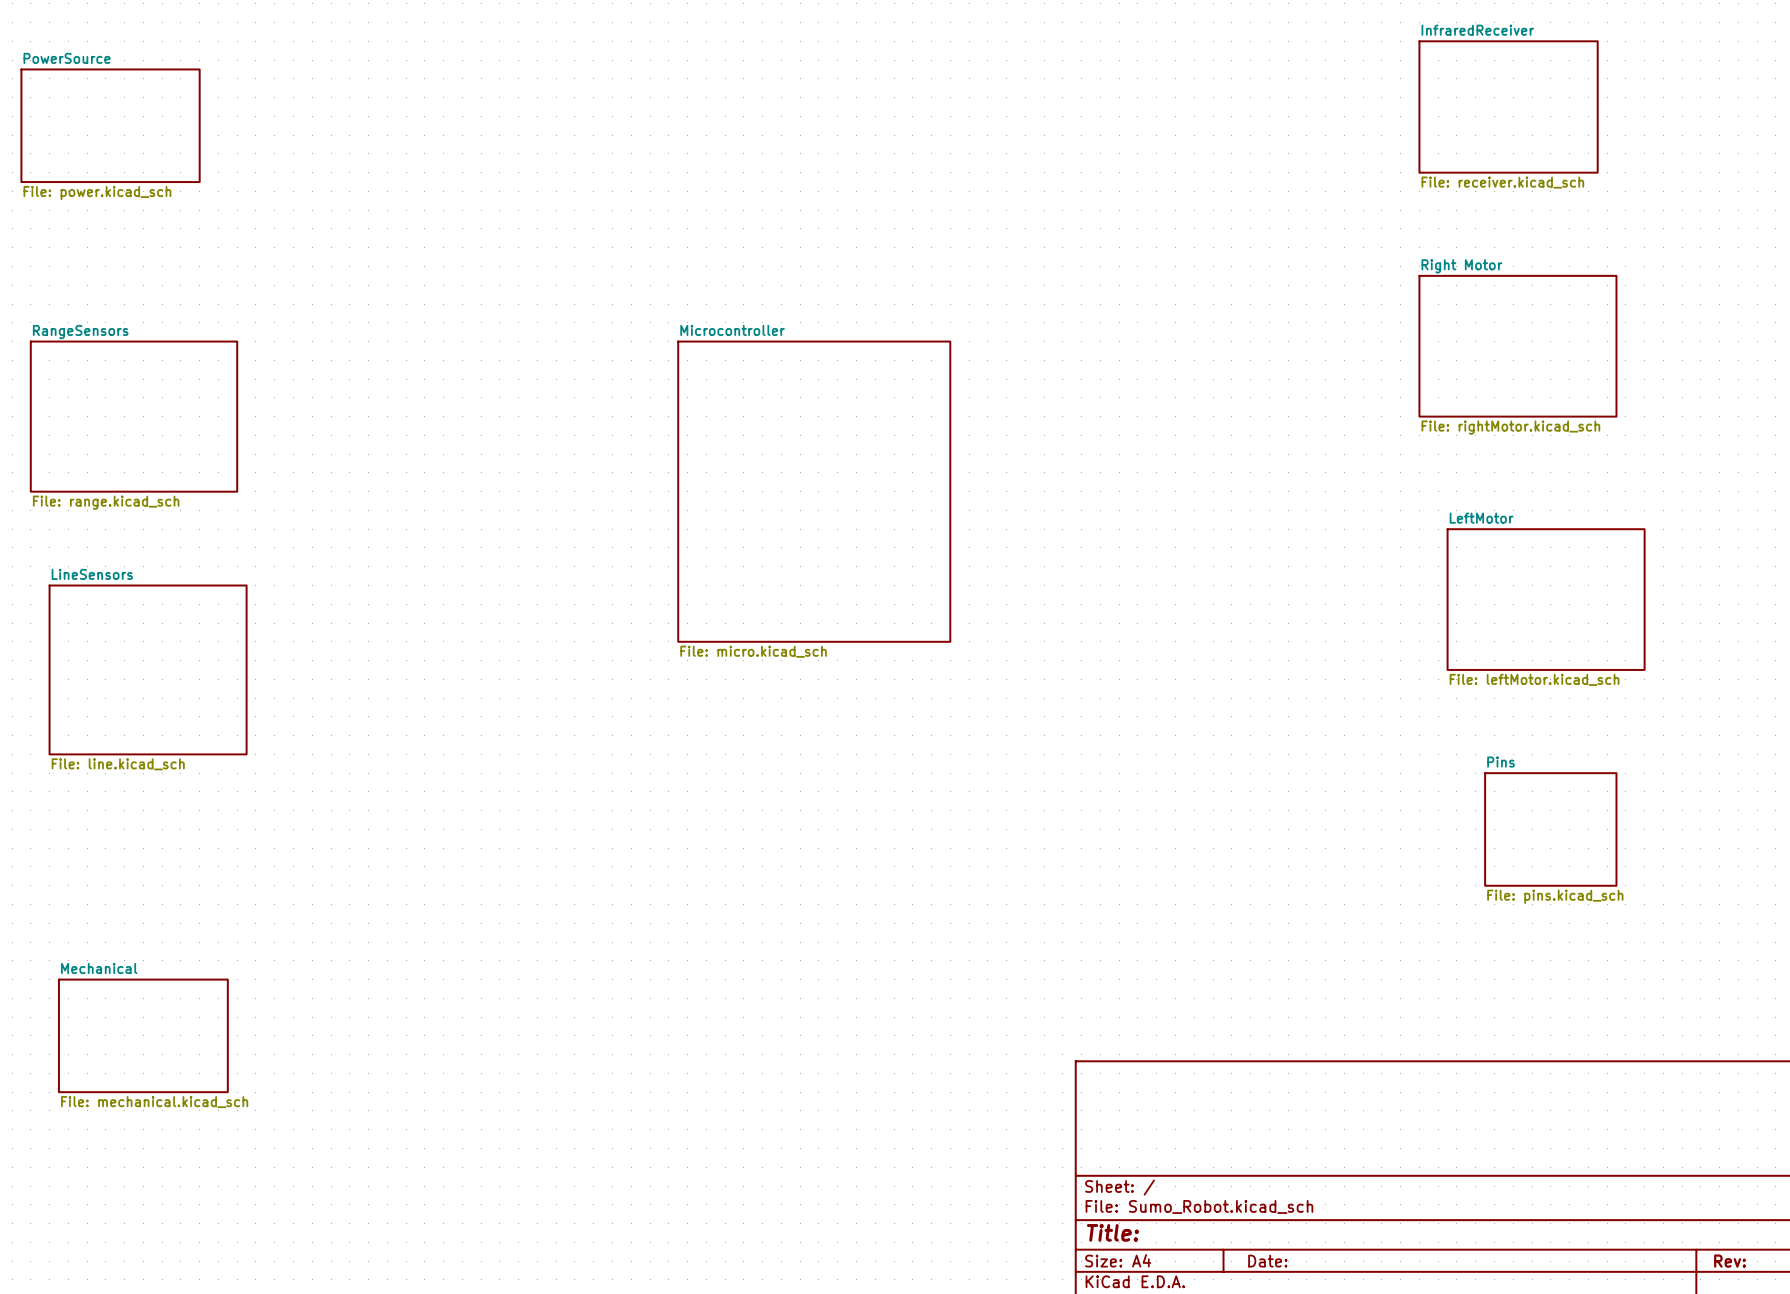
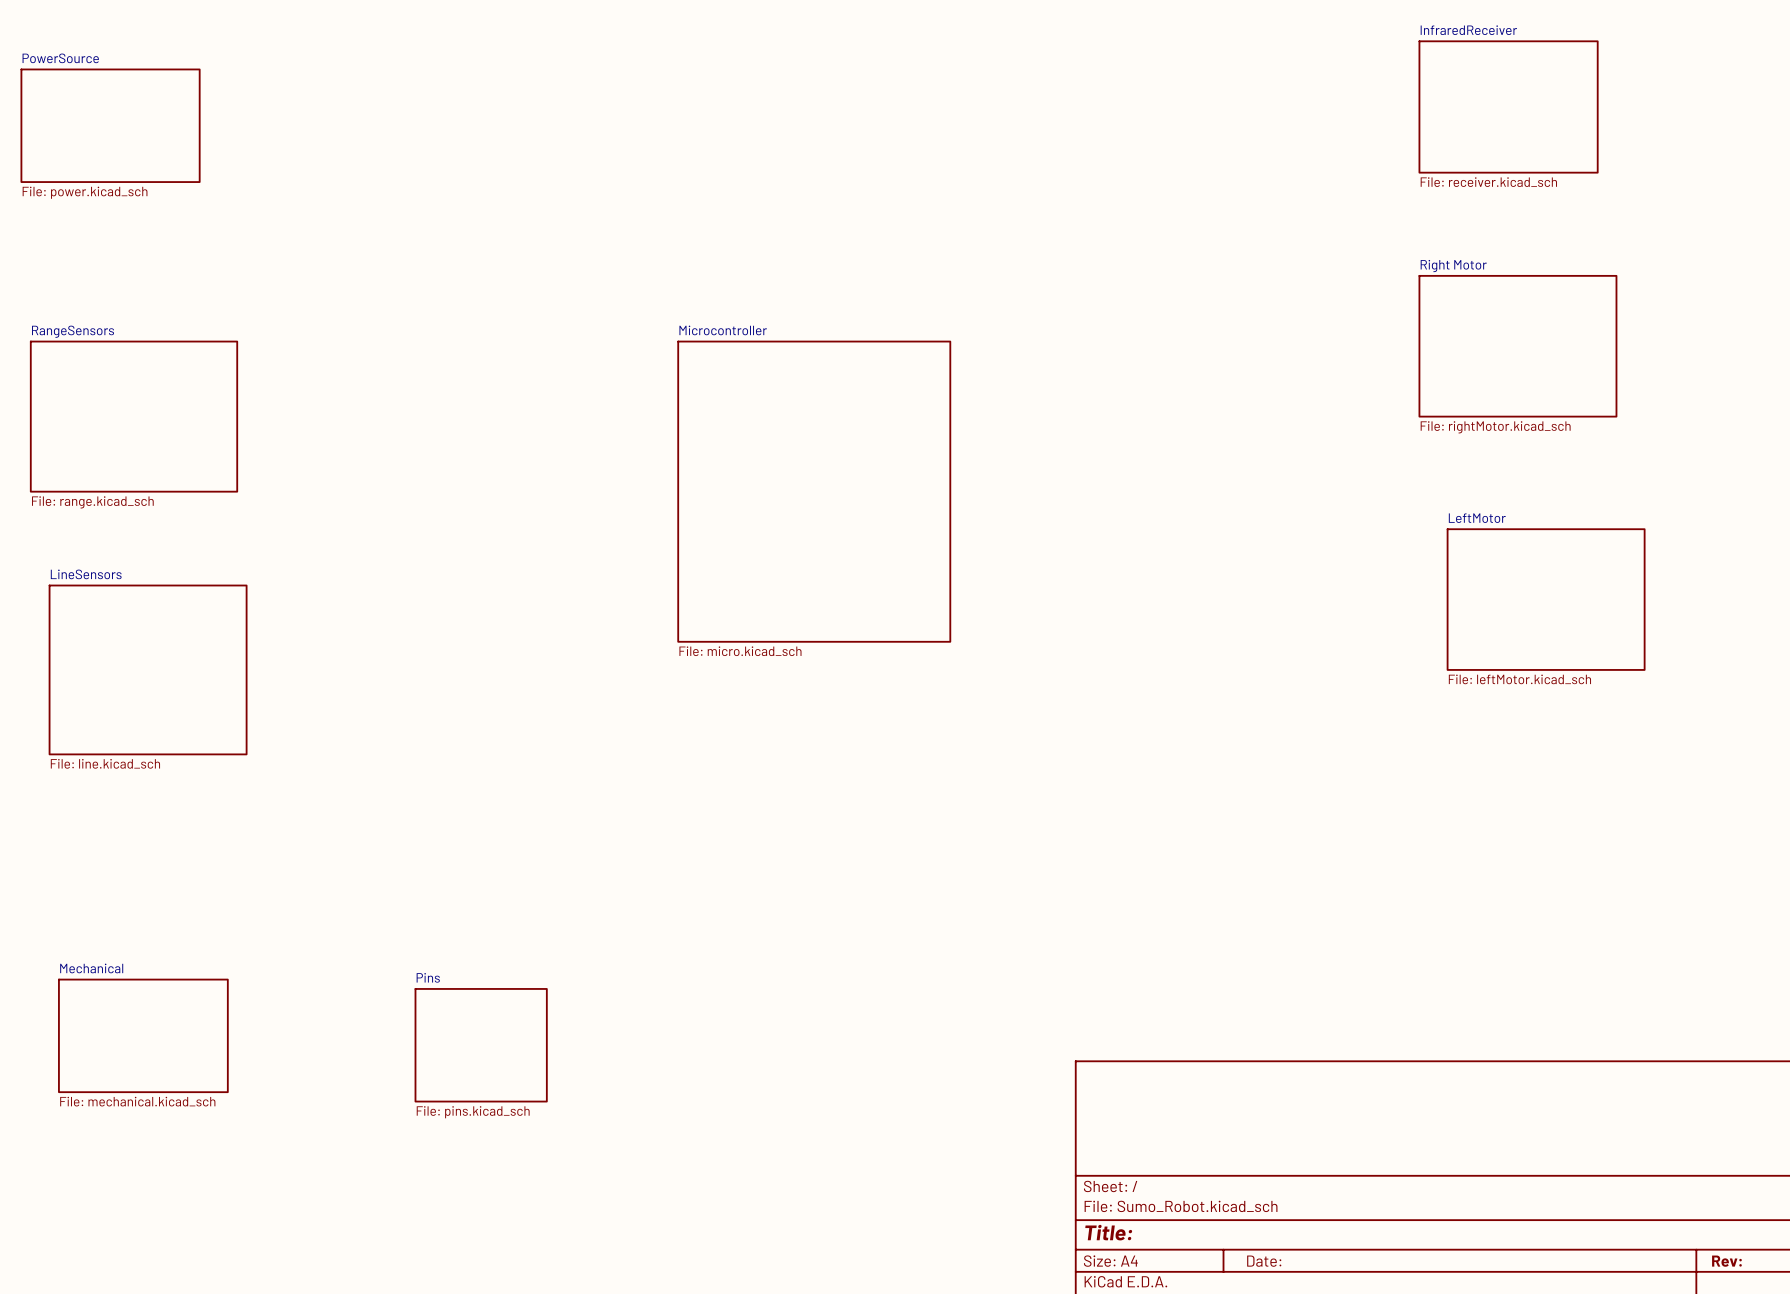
sheet Pins: File: pins.kicad_sch (1550, 829) -> none
sheet Pins: none -> File: pins.kicad_sch (481, 1045)

